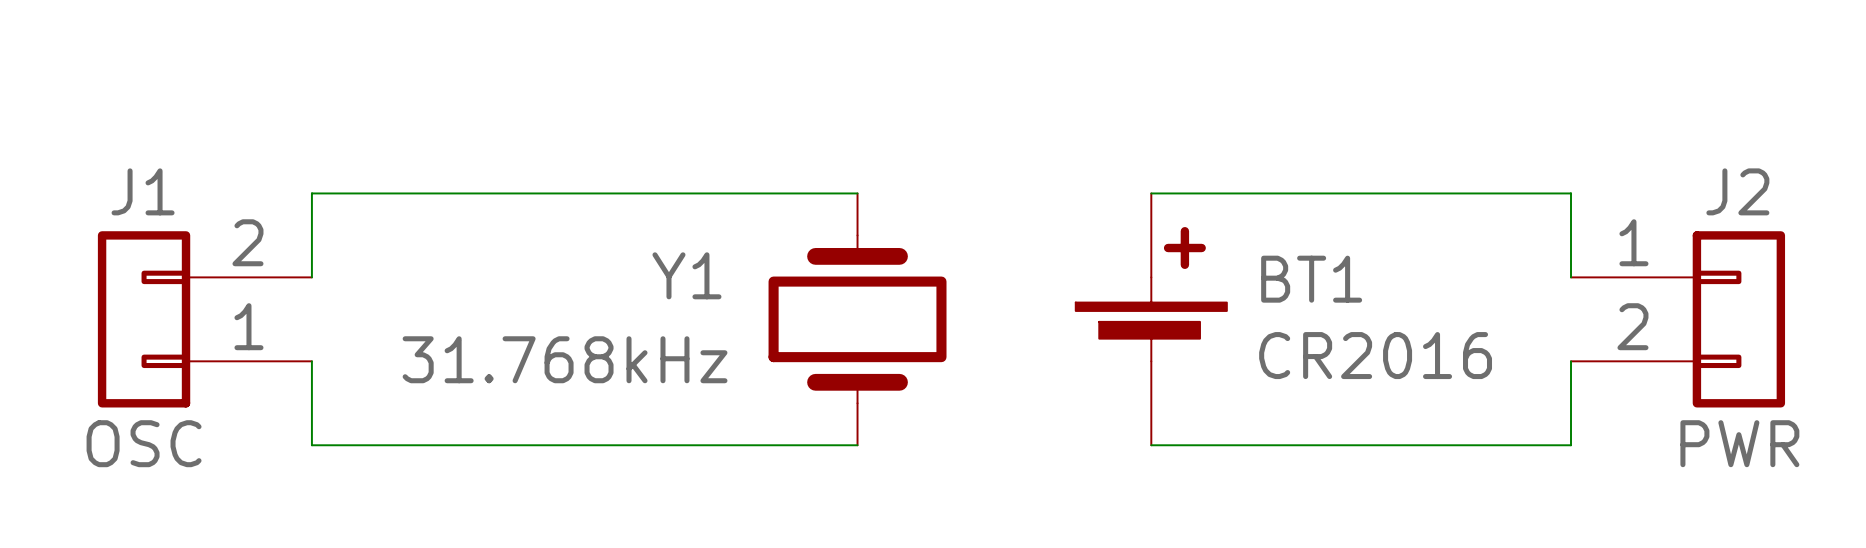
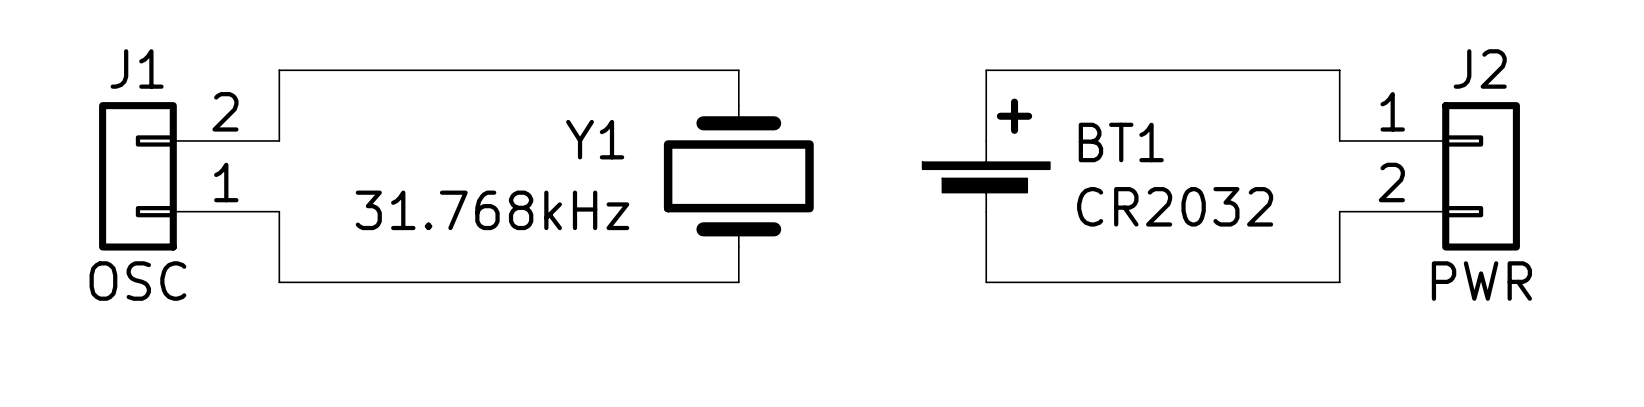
BT1 value: CR2016 (1375, 355) -> CR2032 (1175, 206)

